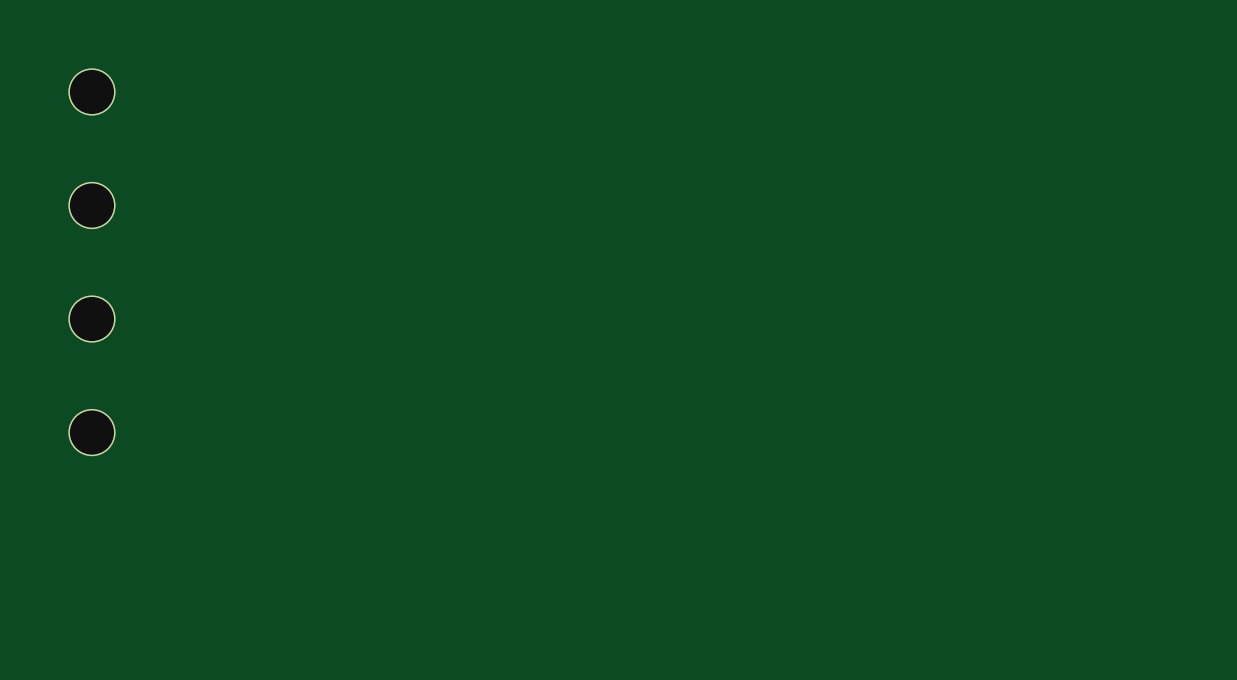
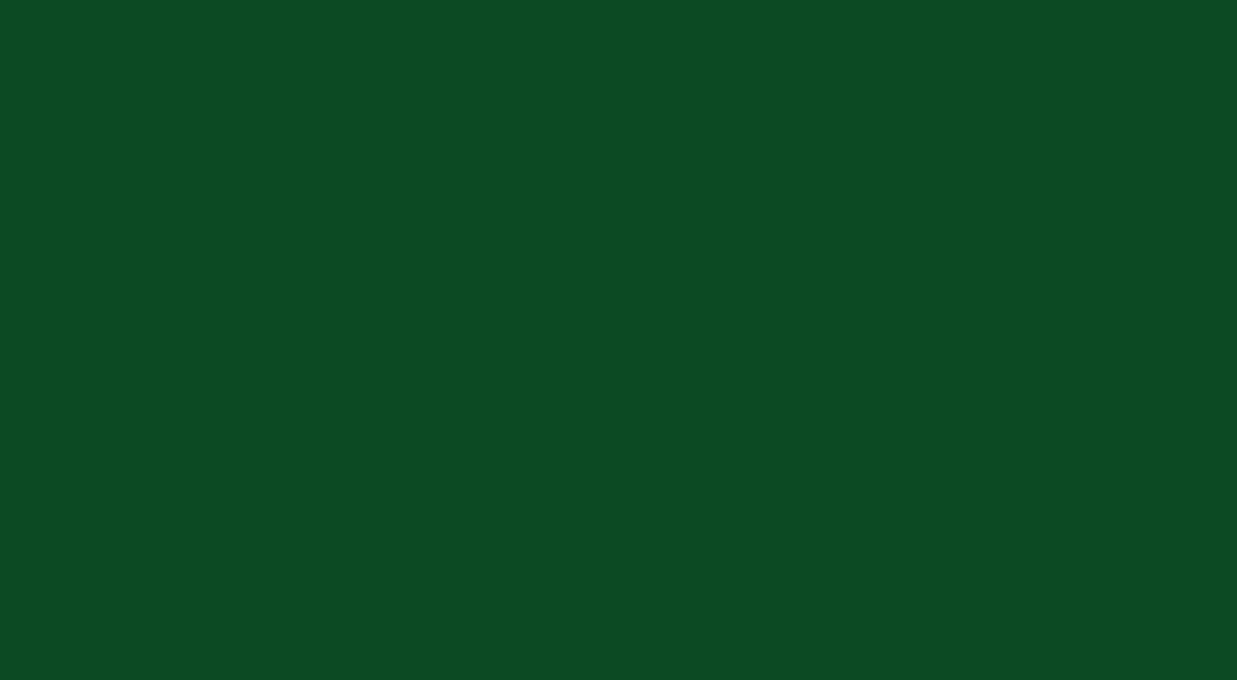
part: (91, 91) -> none
part: (91, 205) -> none
part: (91, 319) -> none
part: (91, 432) -> none

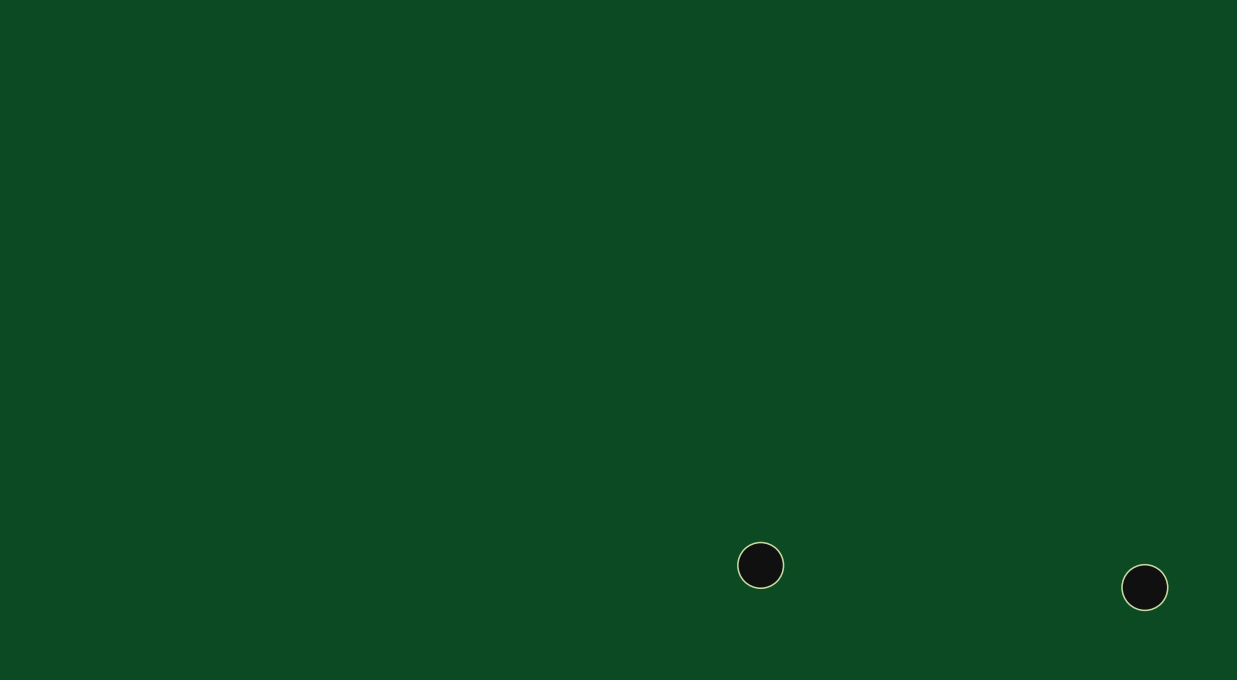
part: none -> (760, 565)
part: none -> (1144, 587)

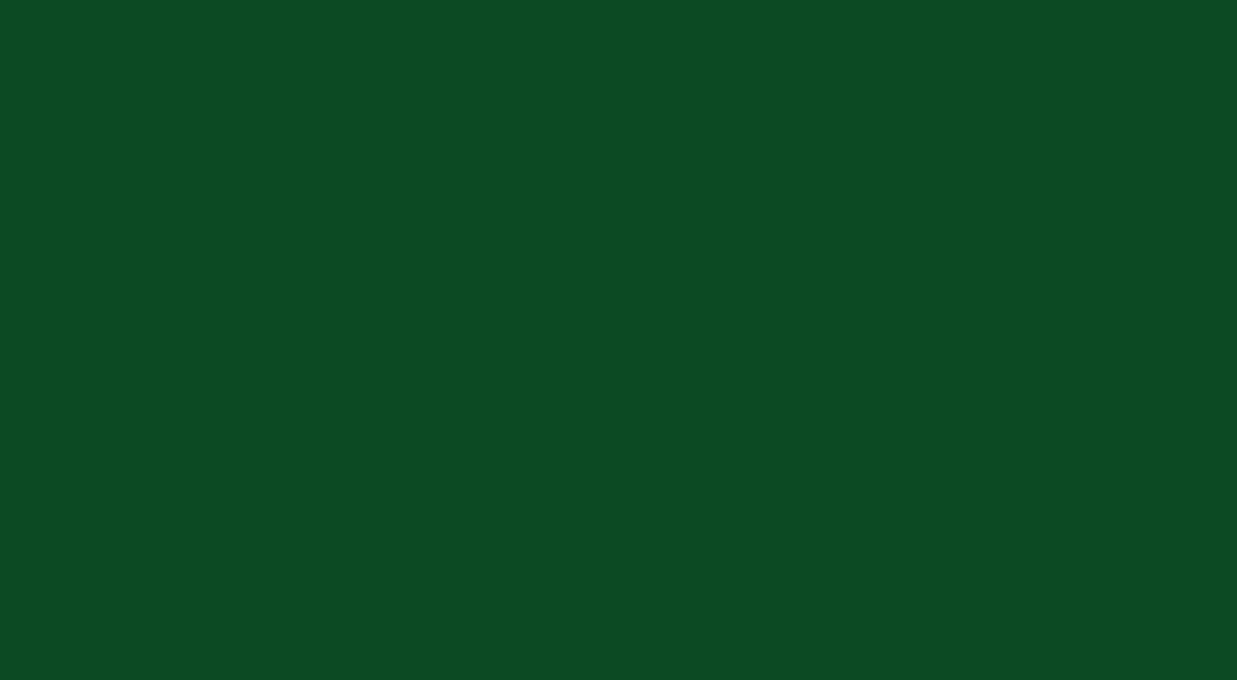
part: (760, 565) -> none
part: (1144, 587) -> none

